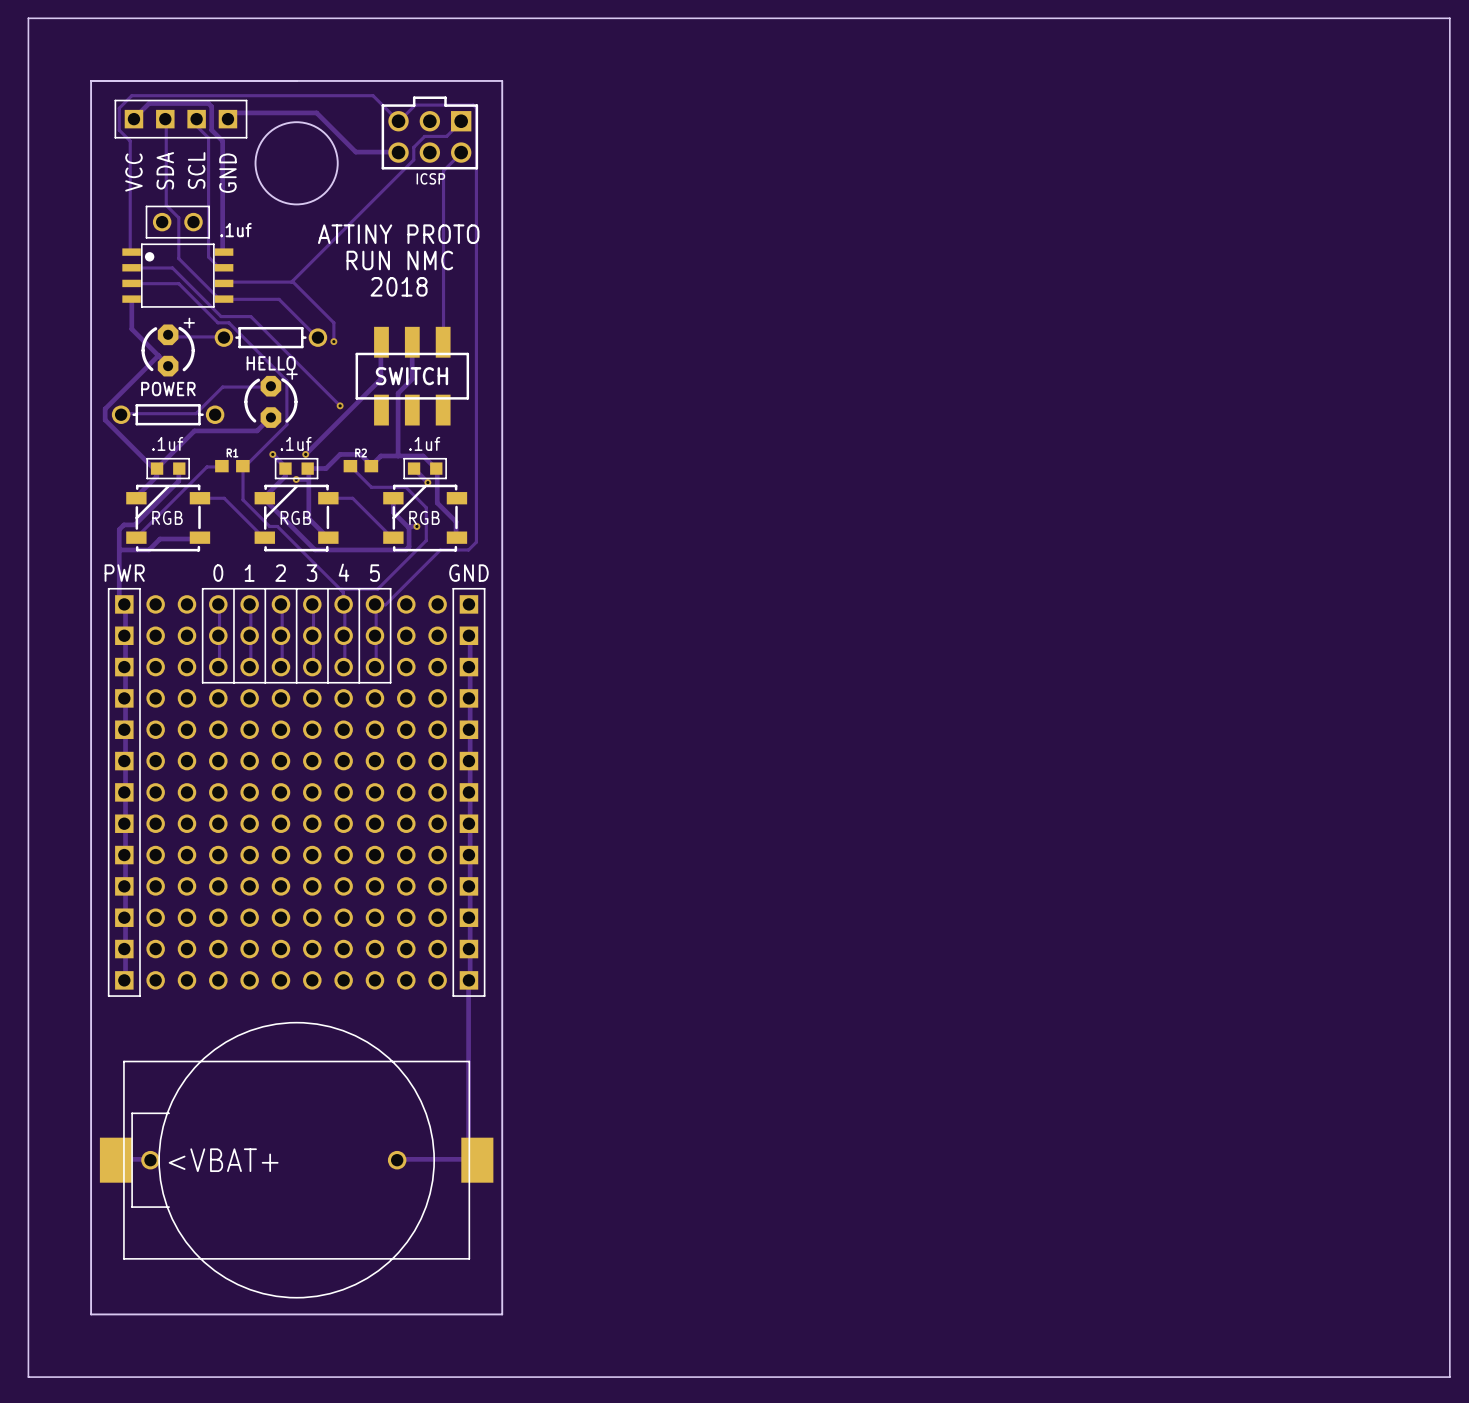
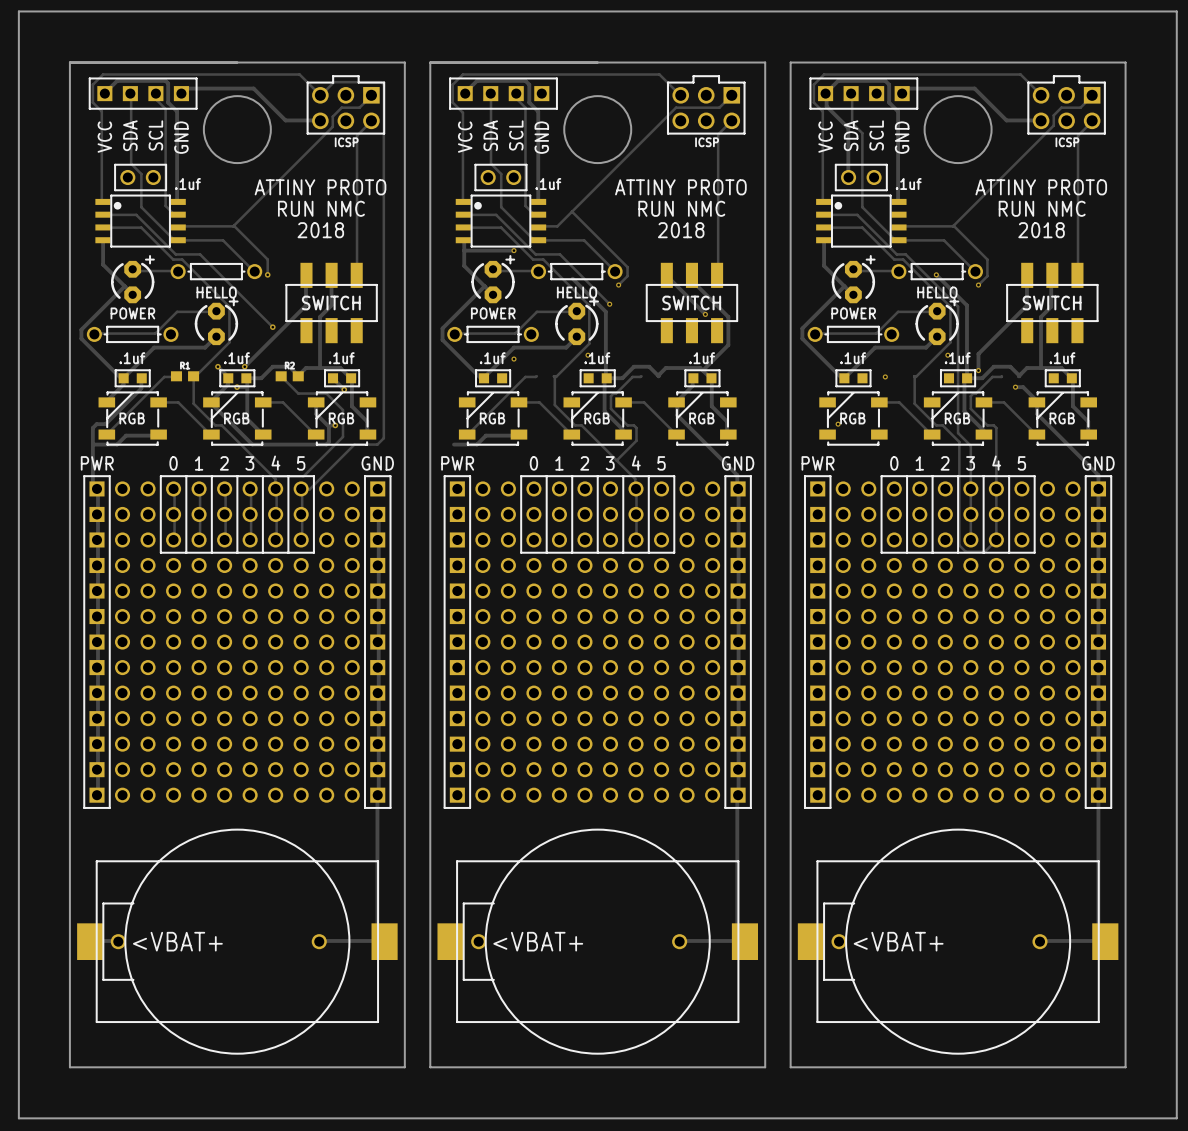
board edge: none -> (430, 62) (430, 1067) (765, 1067) (765, 62) (430, 62)
board edge: none -> (790, 62) (1125, 62) (1125, 1067) (790, 1067) (790, 62)
track: none -> (465, 93) (476, 80) (525, 80) (529, 84) (529, 102) (538, 111) (538, 201)
track: none -> (490, 93) (491, 163) (501, 174) (501, 207) (533, 239) (584, 240) (615, 271)
part: none -> (503, 93)
track: none -> (516, 93) (516, 98) (525, 107) (525, 205) (533, 213) (538, 214)
track: none -> (851, 93) (852, 123) (862, 133) (862, 207) (894, 239) (944, 240) (975, 271)
part: none -> (863, 93)
track: none -> (902, 93) (907, 88) (974, 88) (1006, 120) (1041, 120)
round board edge: none -> [563, 95, 632, 164]
track: none -> (680, 95) (659, 74) (462, 74) (452, 84) (452, 102) (462, 112) (463, 201)
track: none -> (731, 95) (719, 107) (676, 107) (557, 226) (538, 227)
round board edge: none -> [923, 95, 993, 164]
track: none -> (1041, 95) (1020, 74) (824, 74) (813, 84) (813, 102) (822, 111) (823, 201)
track: none -> (1092, 95) (1080, 107) (1061, 107) (1053, 115) (1053, 125) (952, 226) (899, 227)
part: none -> (706, 104)
part: none -> (1066, 104)
track: none -> (731, 120) (718, 134) (717, 275)
track: none -> (1092, 120) (1078, 135) (1077, 275)
part: none -> (500, 177)
track: none -> (848, 177) (848, 128) (826, 106) (825, 93) (838, 80) (885, 80) (889, 84) (889, 102) (898, 111) (899, 201)
part: none -> (861, 177)
text: none -> .1uf (548, 183)
text: none -> .1uf (908, 183)
text: none -> ATTINY PROTO (680, 187)
text: none -> ATTINY PROTO (1041, 187)
text: none -> RUN NMC (681, 208)
text: none -> RUN NMC (1042, 208)
track: none -> (572, 211) (627, 267) (627, 276) (618, 285)
track: none -> (463, 214) (496, 214) (535, 254) (559, 254) (609, 304)
track: none -> (823, 214) (857, 214) (896, 254) (905, 254) (958, 306) (958, 433) (970, 445) (970, 539)
part: none -> (500, 221)
part: none -> (861, 221)
track: none -> (953, 225) (987, 259) (987, 276) (978, 285)
track: none -> (463, 227) (501, 227) (533, 259) (543, 259) (589, 305) (589, 343) (556, 376) (553, 376) (554, 405) (575, 425) (581, 425) (635, 479) (636, 539)
track: none -> (823, 227) (862, 227) (894, 259) (903, 259) (950, 306) (950, 342) (915, 376) (914, 376) (914, 403) (936, 425) (942, 425) (959, 442) (959, 545) (965, 551) (984, 551) (996, 540) (996, 427) (993, 425) (987, 425) (970, 408) (970, 396) (992, 376) (1001, 376)
text: none -> 2018 (681, 230)
text: none -> 2018 (1041, 230)
track: none -> (463, 240) (464, 265) (493, 294)
track: none -> (823, 240) (824, 265) (853, 294)
track: none -> (464, 250) (513, 250)
via: none -> (513, 250)
track: none -> (493, 269) (494, 271) (538, 271)
track: none -> (853, 269) (854, 271) (898, 271)
part: none -> (576, 271)
part: none -> (937, 271)
track: none -> (936, 274) (967, 305) (967, 378)
via: none -> (936, 274)
track: none -> (666, 275) (705, 314)
track: none -> (691, 275) (692, 281) (728, 316) (728, 345) (702, 370)
track: none -> (1027, 275) (1026, 305) (978, 353) (978, 370)
track: none -> (1052, 275) (1051, 306) (1041, 316) (1041, 368)
track: none -> (572, 278) (605, 311) (606, 378)
part: none -> (493, 279)
part: none -> (853, 279)
via: none -> (618, 285)
via: none -> (978, 285)
track: none -> (484, 286) (442, 328) (442, 339) (482, 379) (513, 347) (566, 347) (576, 336)
track: none -> (844, 286) (802, 328) (802, 338) (841, 378) (844, 378) (875, 347) (926, 347) (937, 336)
text: none -> HELLO (577, 292)
text: none -> HELLO (937, 292)
part: none -> (691, 303)
part: none -> (1052, 303)
via: none -> (609, 304)
track: none -> (576, 311) (536, 311) (515, 333) (454, 334)
track: none -> (937, 311) (898, 311) (876, 333) (815, 334)
text: none -> POWER (493, 313)
text: none -> POWER (853, 313)
via: none -> (705, 314)
part: none -> (576, 321)
part: none -> (937, 321)
part: none -> (493, 334)
part: none -> (853, 334)
via: none -> (588, 355)
via: none -> (947, 355)
via: none -> (513, 359)
via: none -> (978, 370)
track: none -> (536, 376) (525, 376) (467, 434)
track: none -> (641, 376) (632, 376) (610, 396) (610, 408) (627, 425) (633, 425) (636, 427) (636, 440) (616, 460)
via: none -> (885, 376)
track: none -> (606, 378) (622, 378) (633, 366) (649, 366) (658, 376) (665, 368) (700, 368) (711, 378) (711, 406) (727, 421) (728, 434)
track: none -> (606, 378) (604, 380) (604, 411) (622, 429) (623, 434)
track: none -> (693, 378) (692, 385) (676, 402) (677, 415) (737, 475) (737, 939) (744, 941) (679, 941)
track: none -> (967, 378) (982, 378) (993, 366) (1010, 366) (1018, 376) (1026, 368) (1061, 368) (1072, 379) (1072, 406) (1088, 421) (1088, 434)
track: none -> (967, 378) (964, 380) (964, 411) (983, 430) (983, 434)
track: none -> (1015, 387) (1023, 387) (1035, 399) (1037, 413) (1098, 475) (1098, 939) (1105, 941) (1039, 941)
via: none -> (1015, 387)
track: none -> (519, 402) (539, 402) (571, 434)
track: none -> (623, 402) (644, 402) (676, 434)
track: none -> (879, 402) (899, 402) (932, 434)
track: none -> (983, 402) (1004, 402) (1036, 434)
part: none -> (493, 407)
part: none -> (597, 407)
part: none -> (702, 407)
part: none -> (853, 407)
part: none -> (958, 407)
part: none -> (1062, 407)
via: none -> (838, 424)
track: none -> (518, 434) (485, 435) (476, 444) (454, 444)
part: none -> (597, 642)
part: none -> (958, 642)
part: none -> (586, 941)
part: none -> (597, 941)
part: none -> (947, 941)
part: none -> (958, 941)

